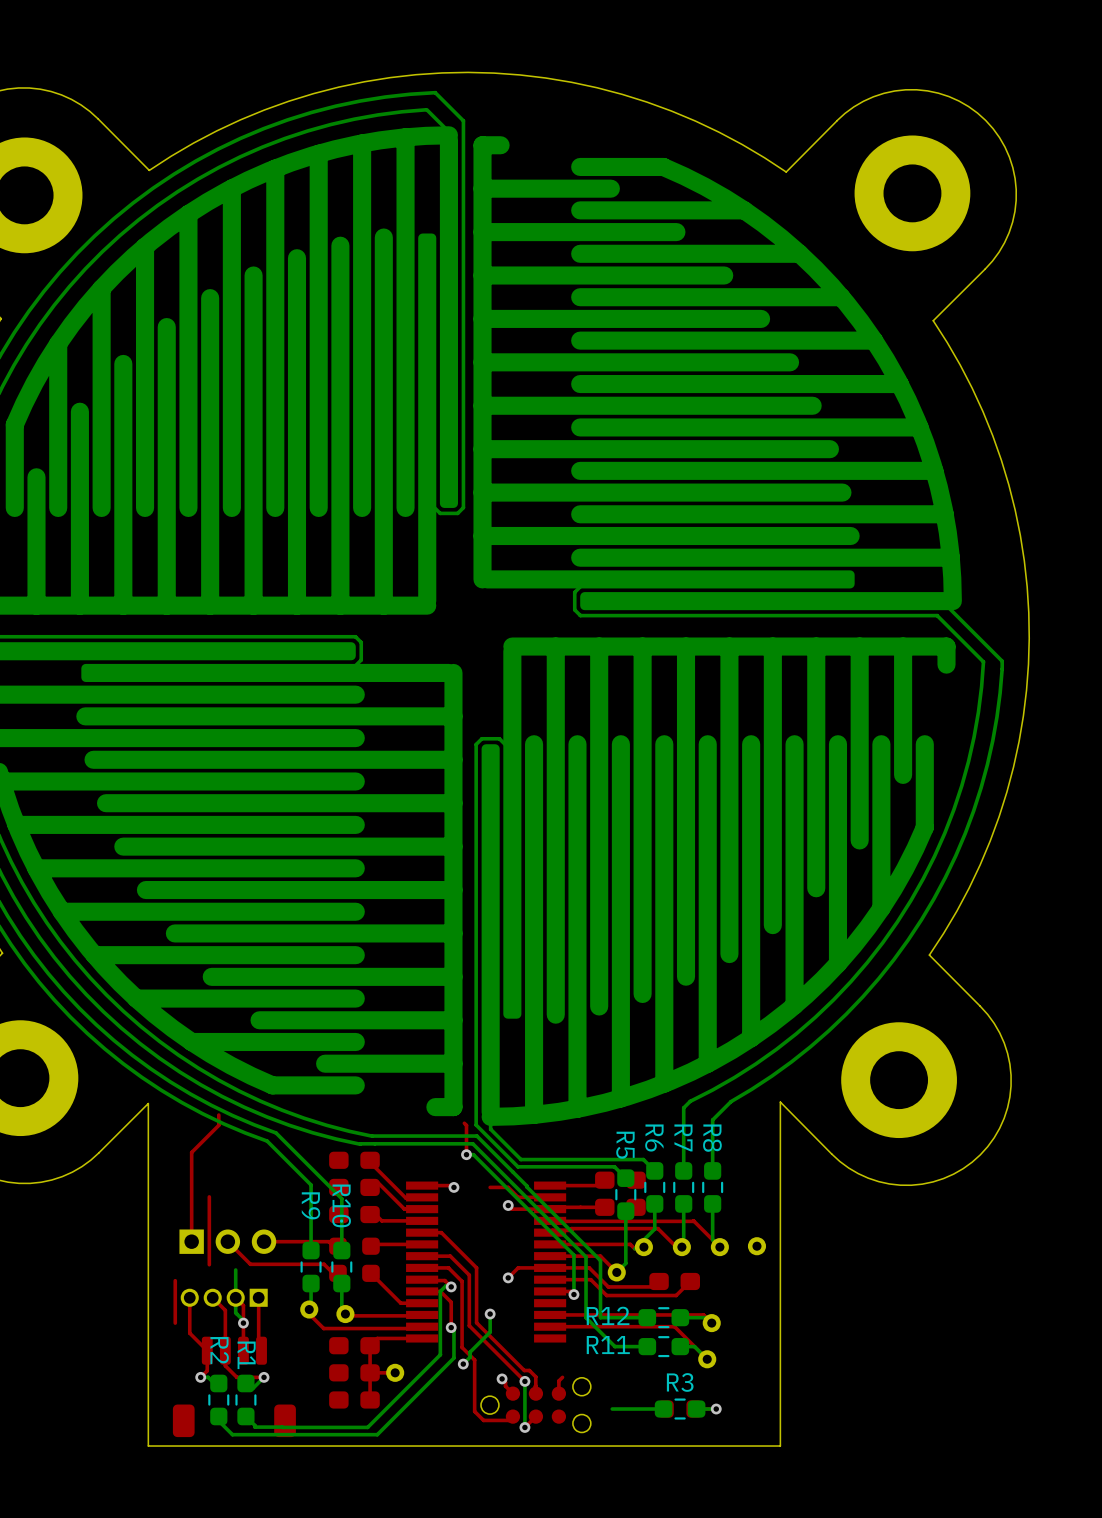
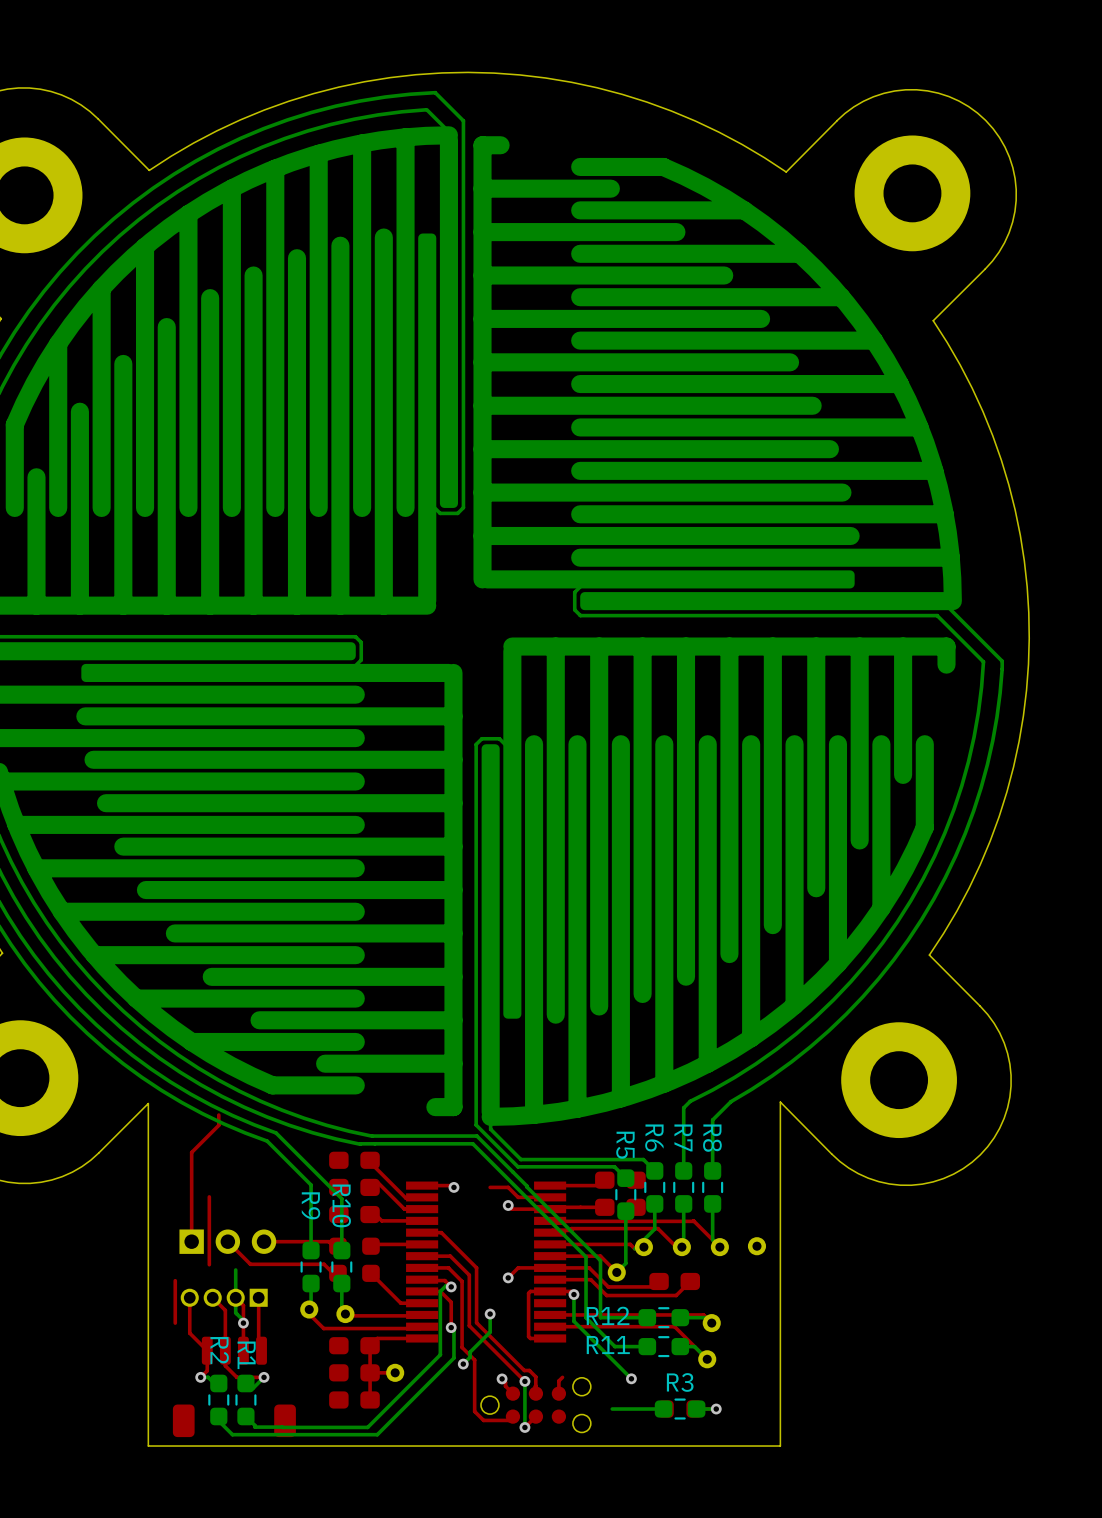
top track: (464, 1123) (466, 1125) (466, 1154) -> none
bottom track: (466, 1154) (473, 1154) (573, 1255) (573, 1294) -> (631, 1378) (573, 1321) (573, 1294)
via: (466, 1154) -> none
top track: none -> (550, 1291) (530, 1291) (528, 1293) (528, 1336) (530, 1338) (550, 1338)
via: none -> (631, 1378)

